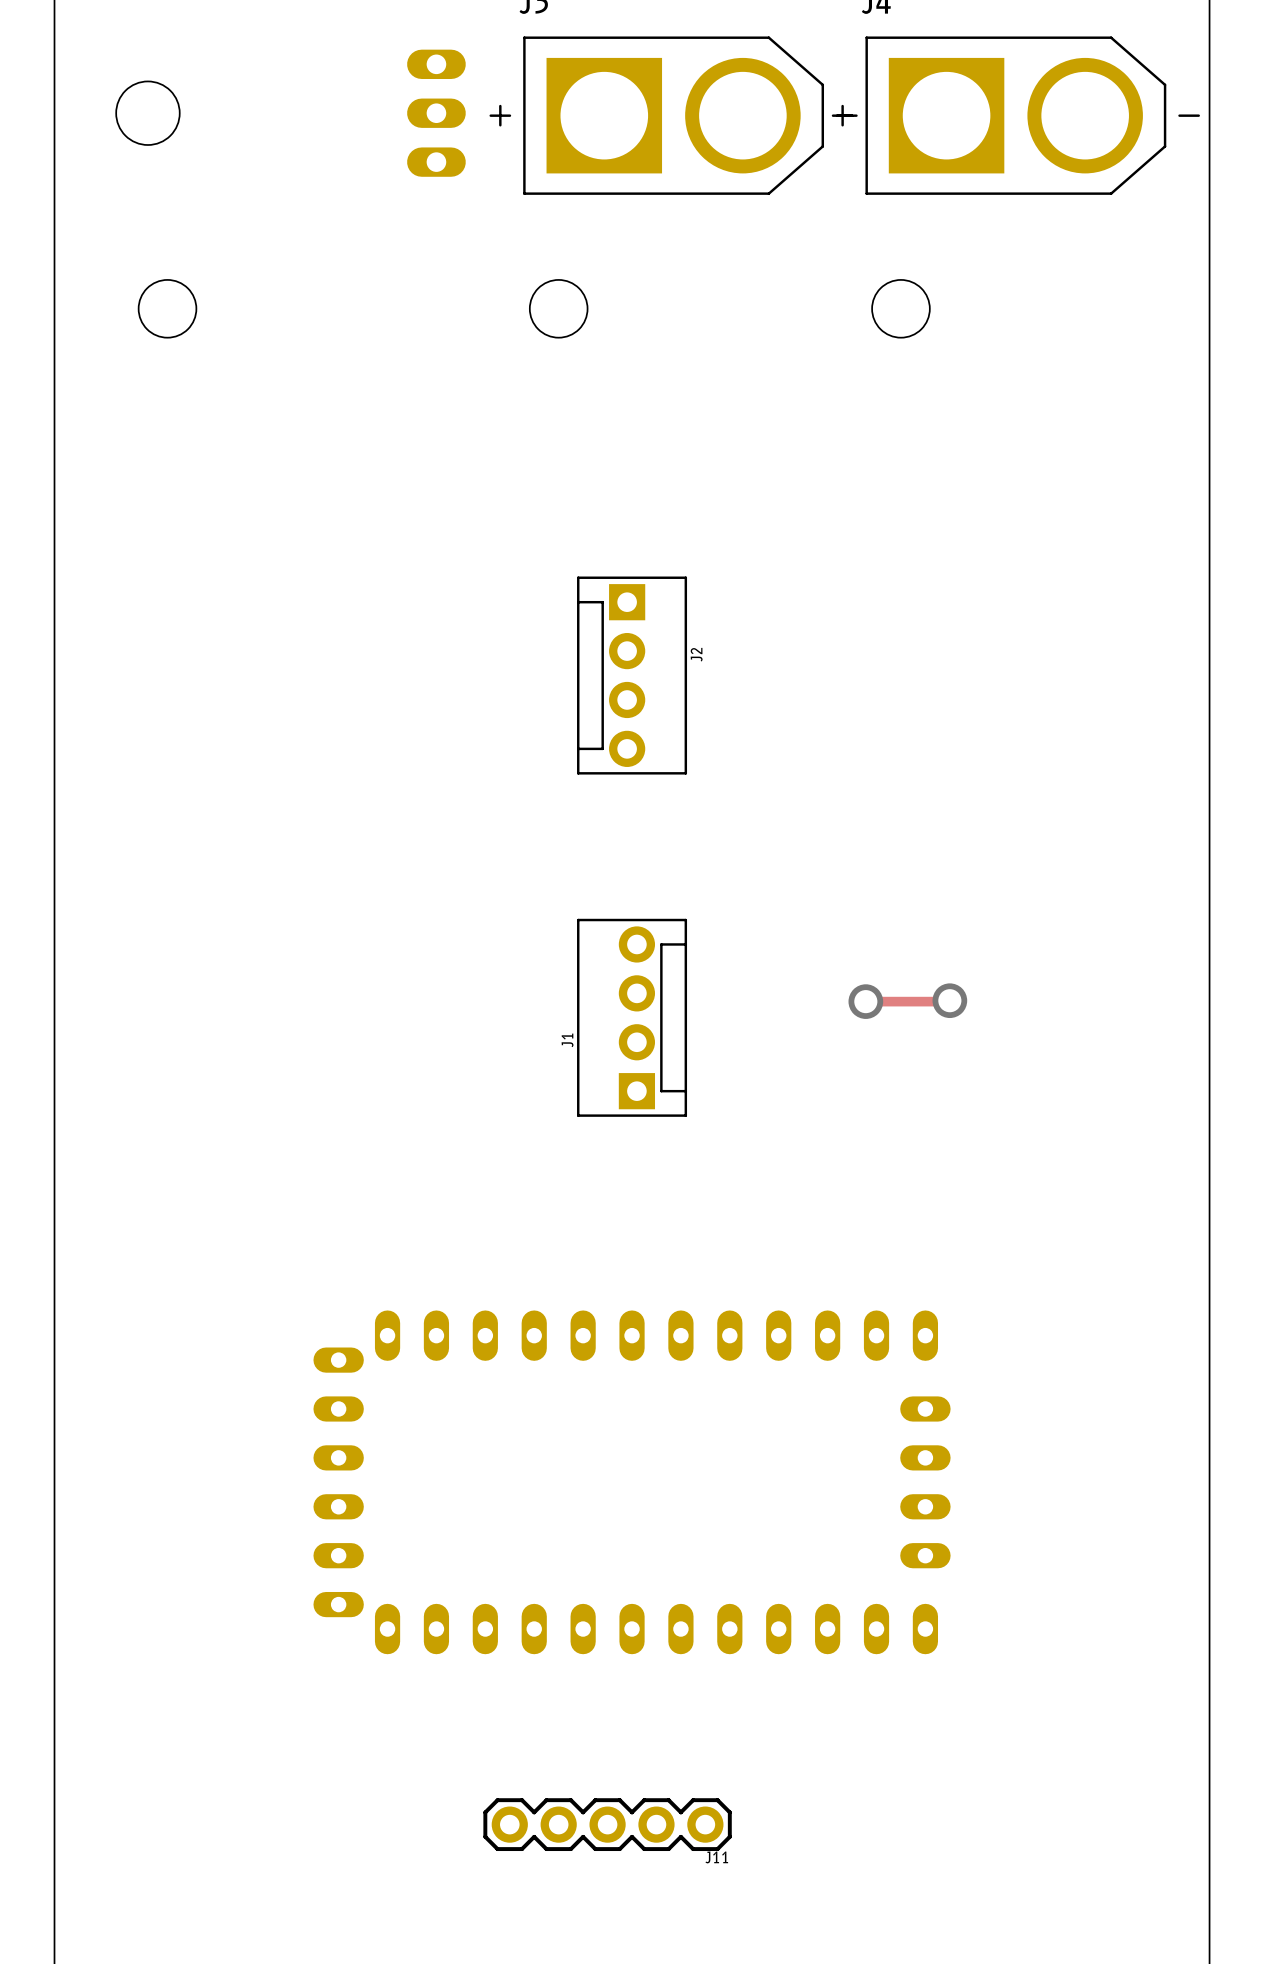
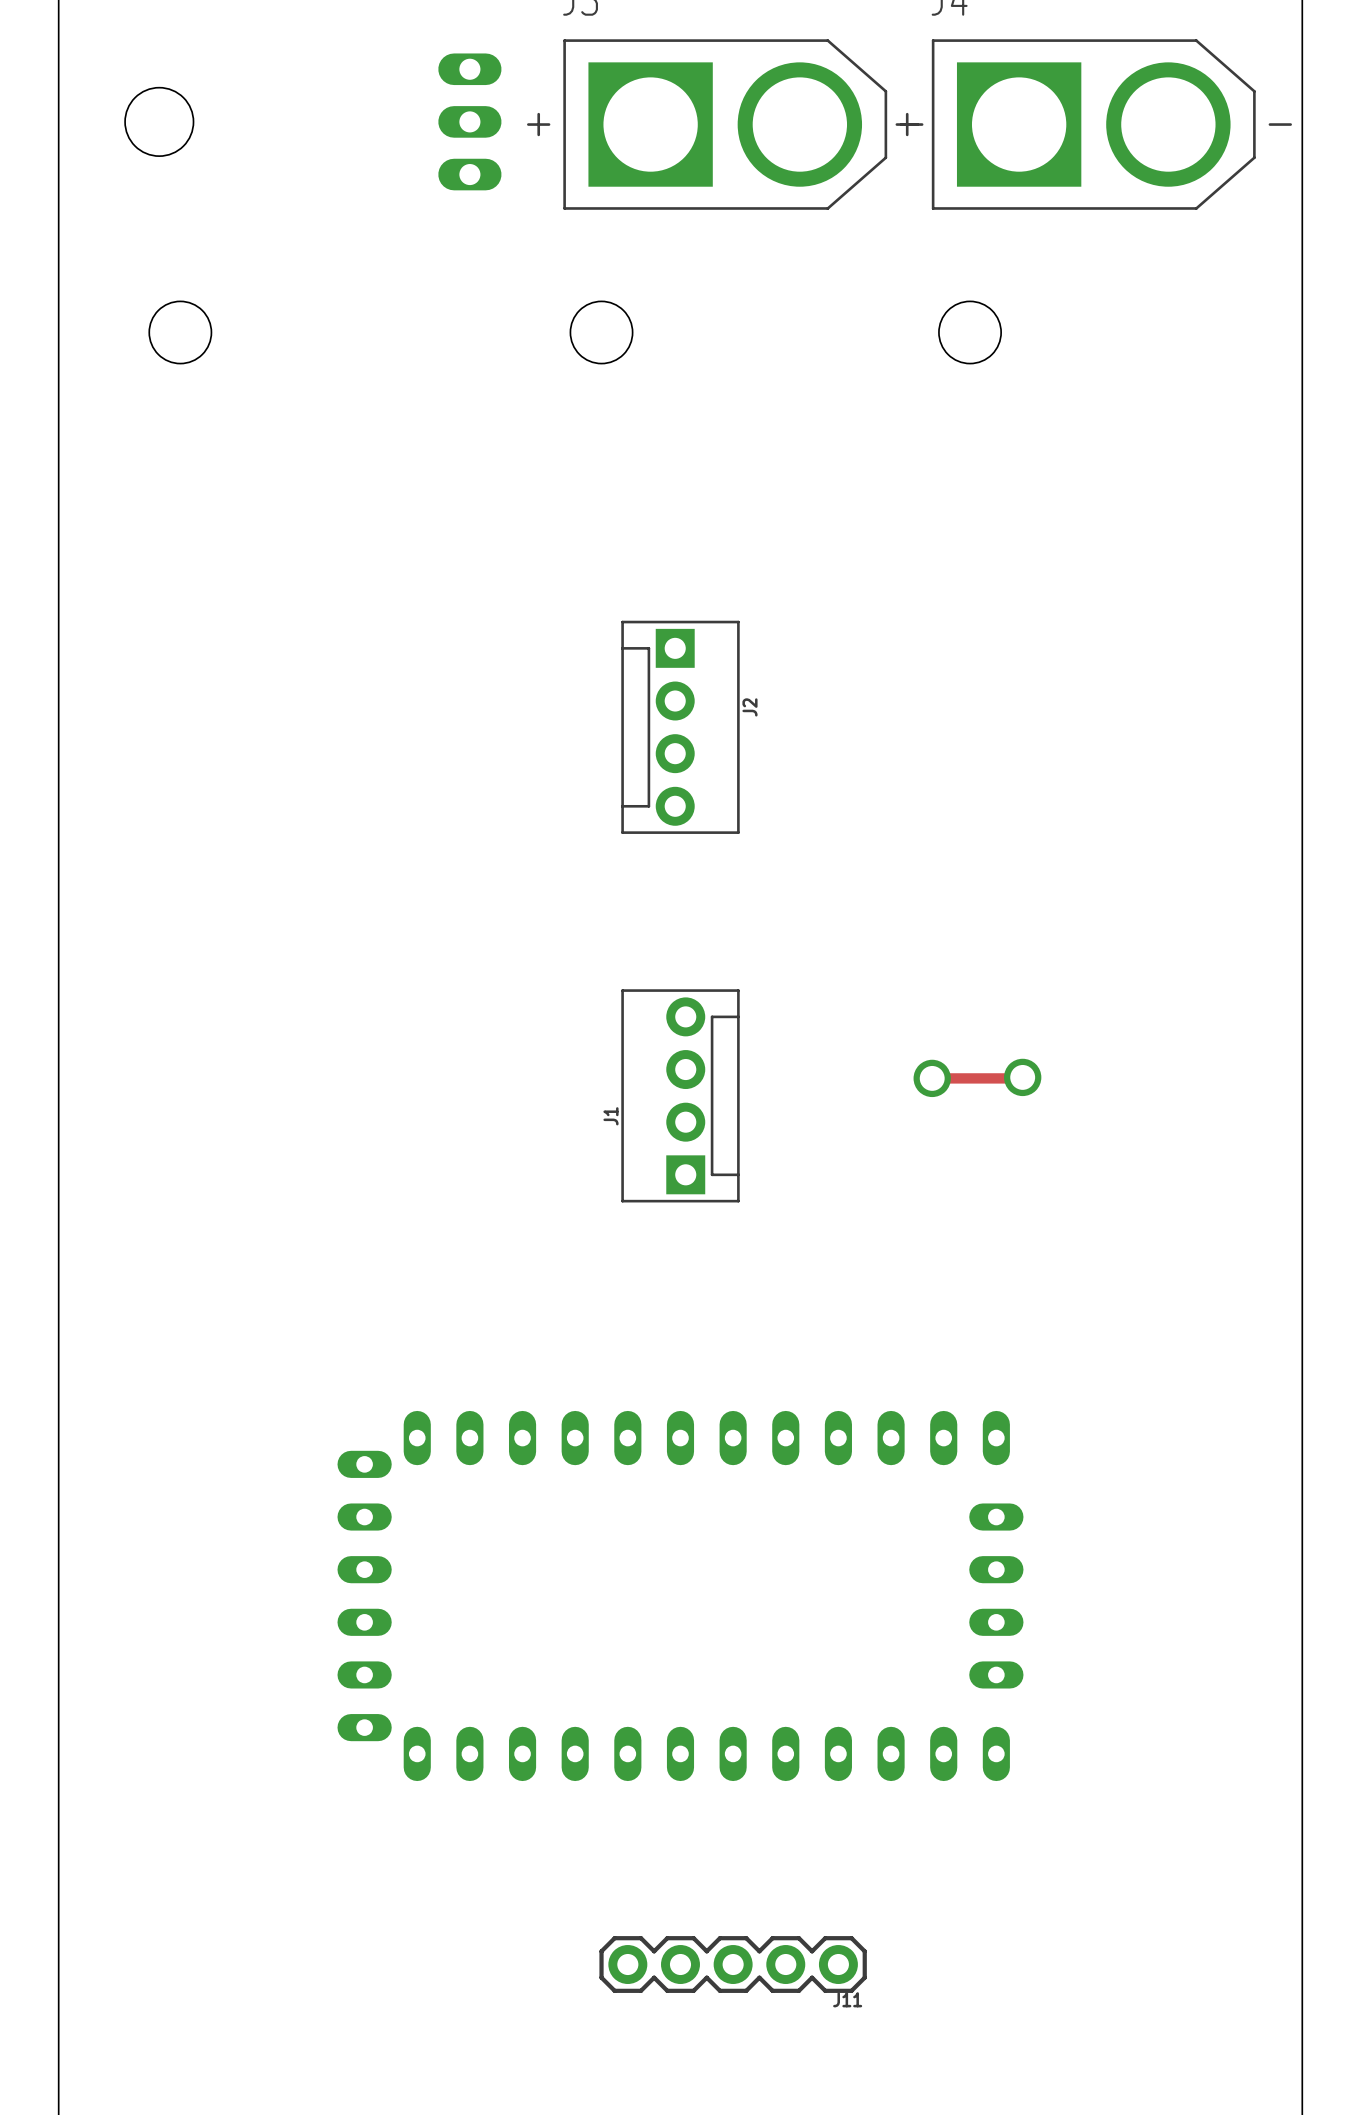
J11 position: (607, 1824) -> (733, 1964)

